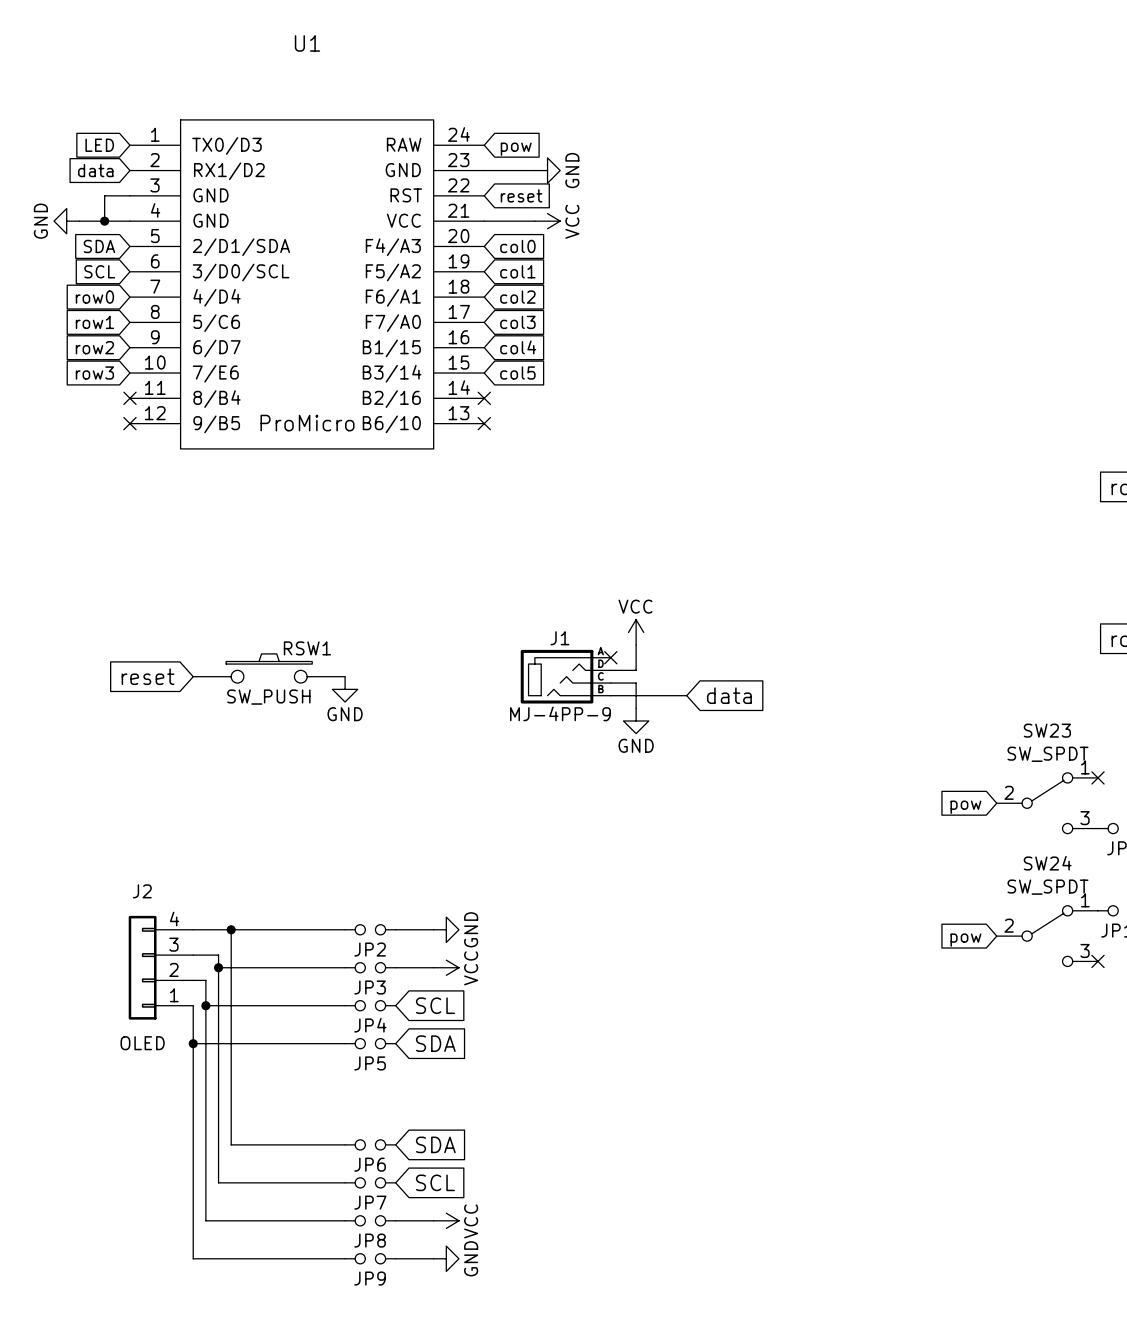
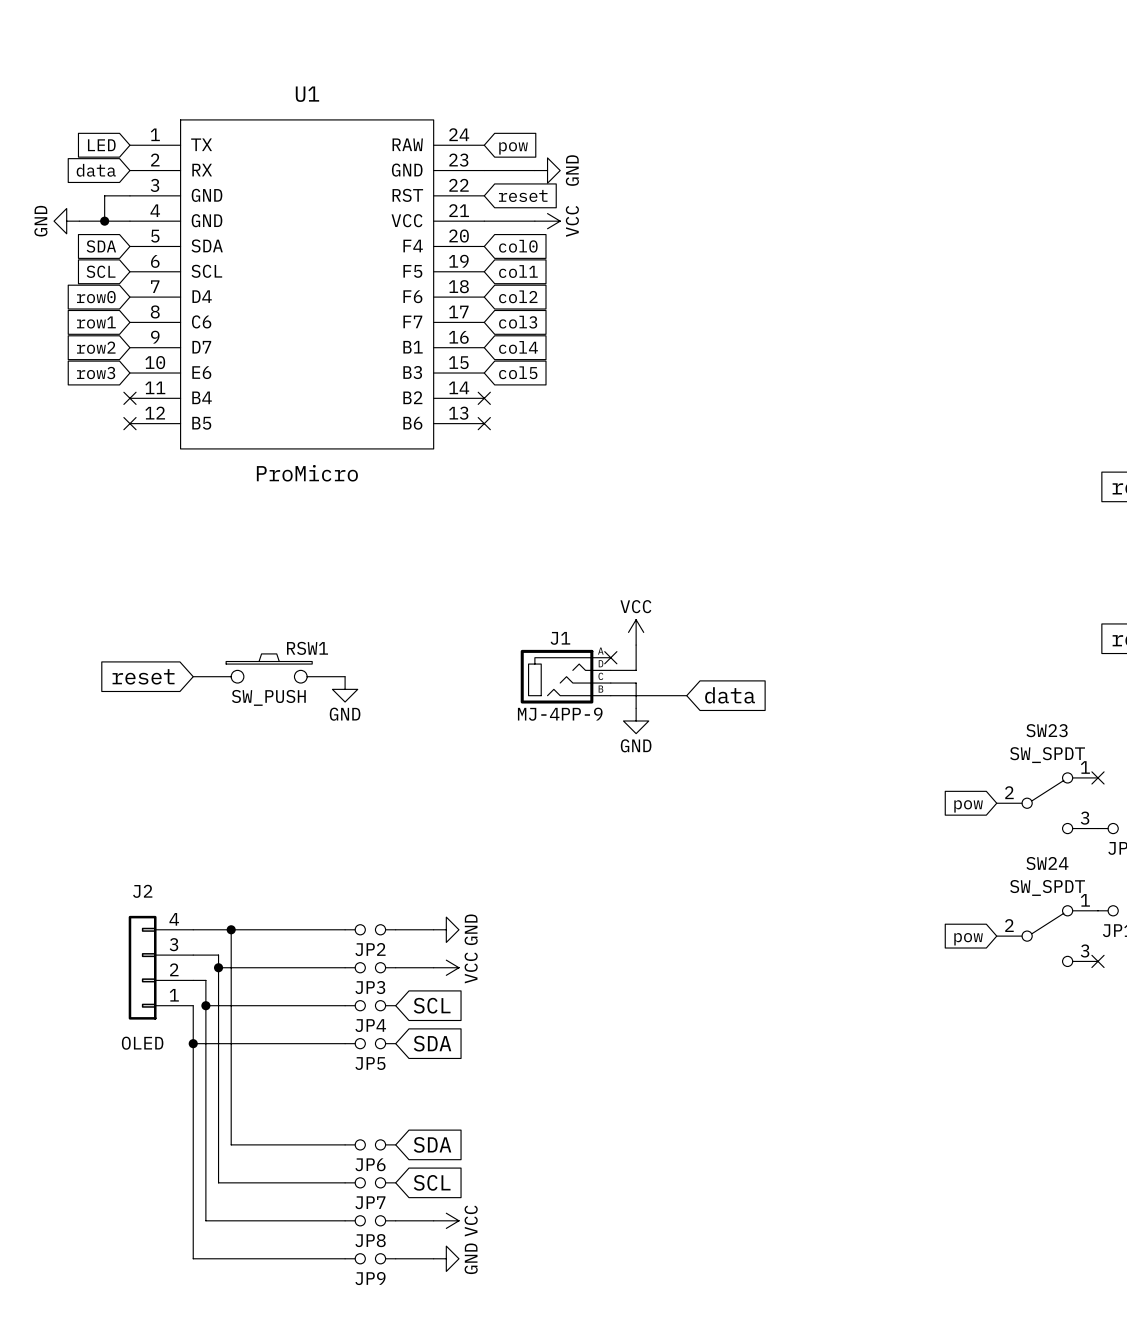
U1 name position: U1 (307, 43) -> U1 (307, 94)
U1 symbol: [129, 119, 485, 449] -> [129, 119, 485, 449]
U1 value position: ProMicro (307, 423) -> ProMicro (307, 473)

